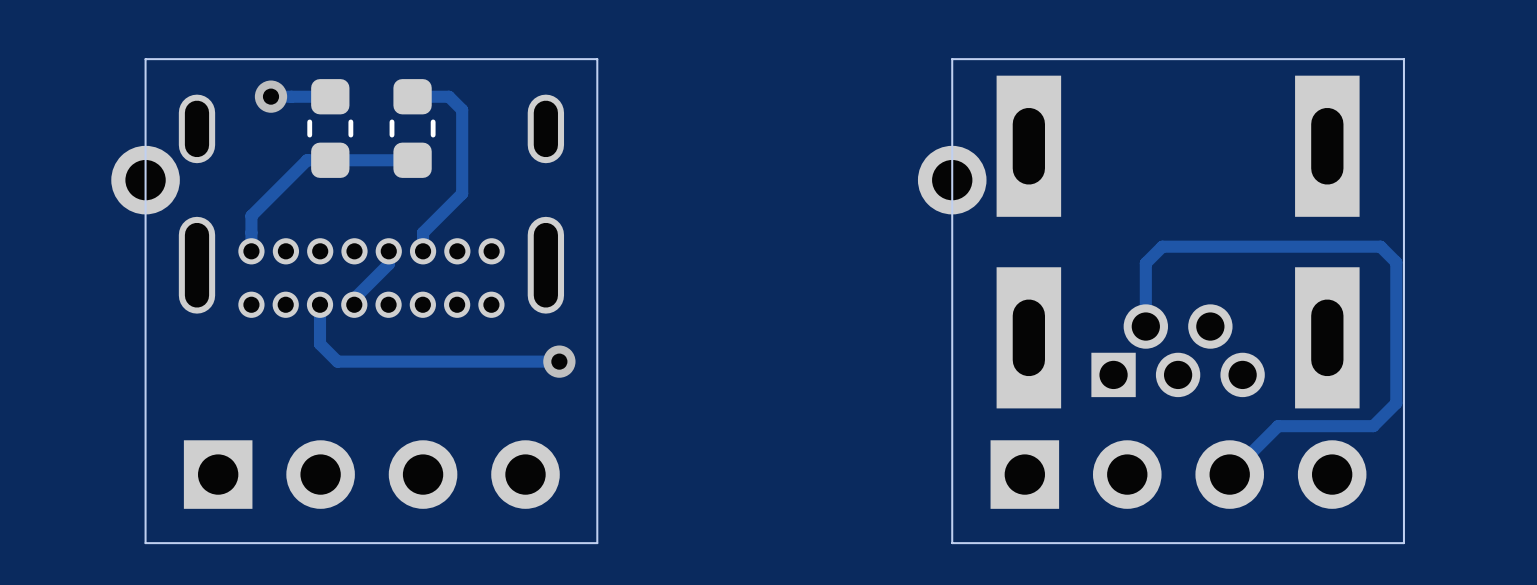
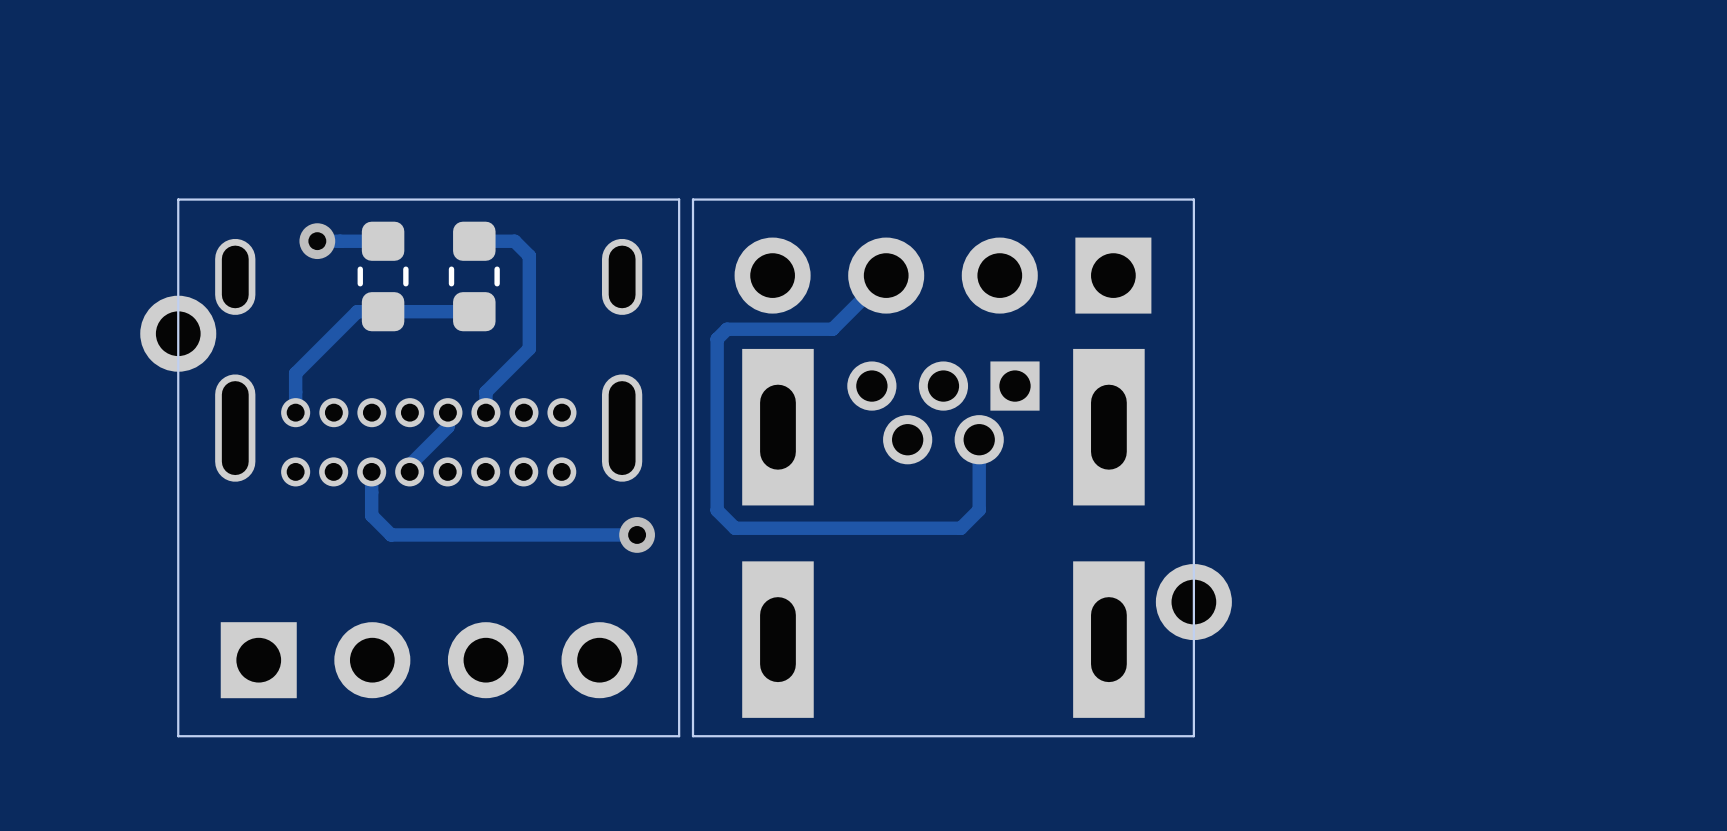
board edge: (952, 59) (952, 543) -> (1072, 199) (693, 199) (693, 736) (1072, 736)
board edge: (1061, 59) (1403, 59) (1403, 543) (1061, 543) -> (1193, 199) (1193, 736)
track: none -> (886, 275) (832, 329) (726, 329) (717, 339) (717, 510) (735, 528) (960, 528) (979, 509) (979, 439)
part position: (952, 180) -> (1193, 602)
part rotation: 0° (1178, 242) -> 180° (943, 533)
part position: (1178, 242) -> (943, 533)
track: (1145, 326) (1145, 263) (1162, 246) (1380, 246) (1396, 262) (1396, 403) (1373, 426) (1278, 426) (1229, 474) -> none
part rotation: 0° (1178, 474) -> 180° (942, 275)
part position: (1178, 474) -> (942, 275)

